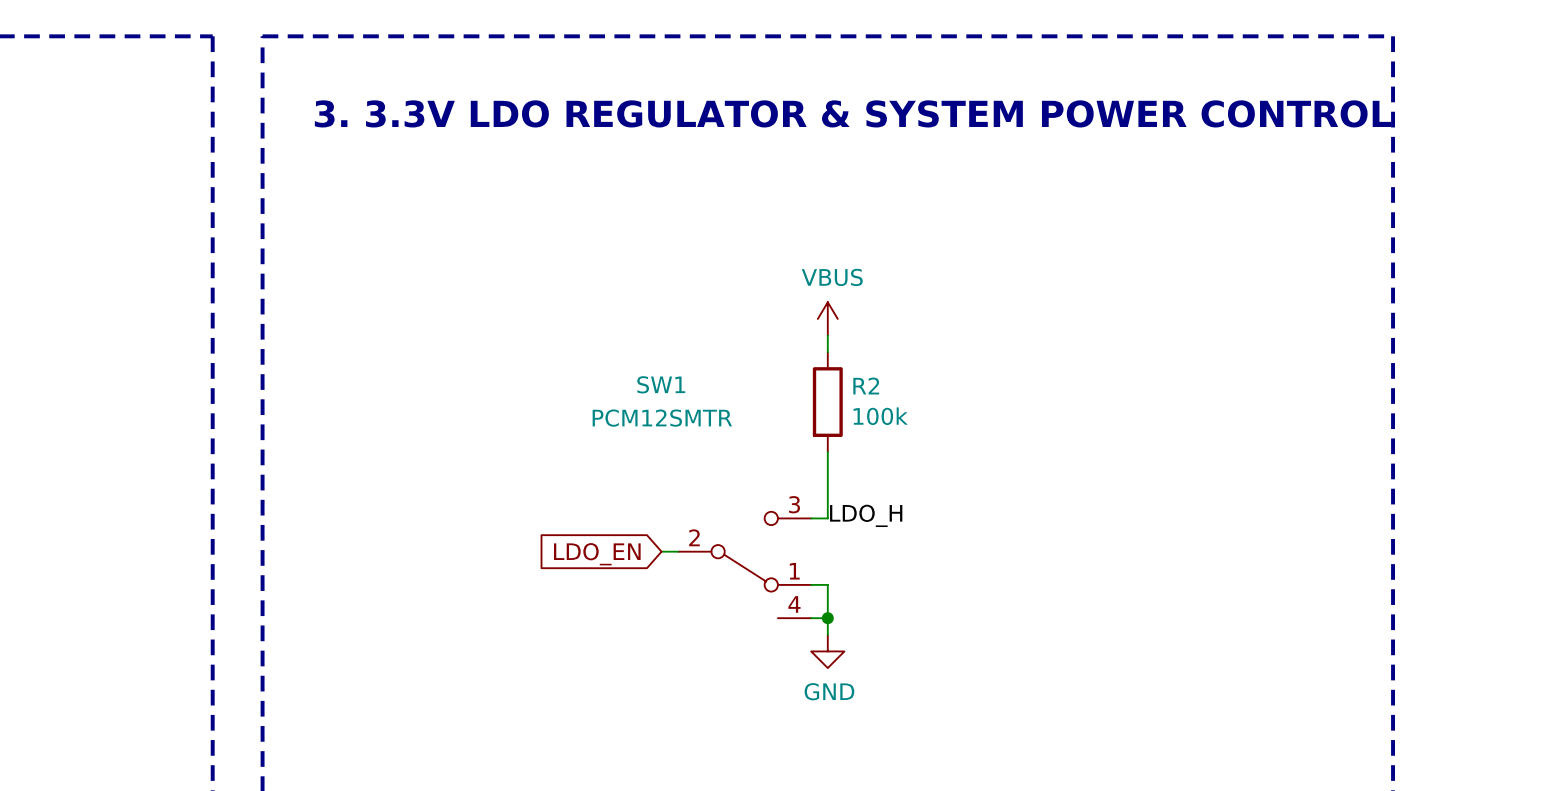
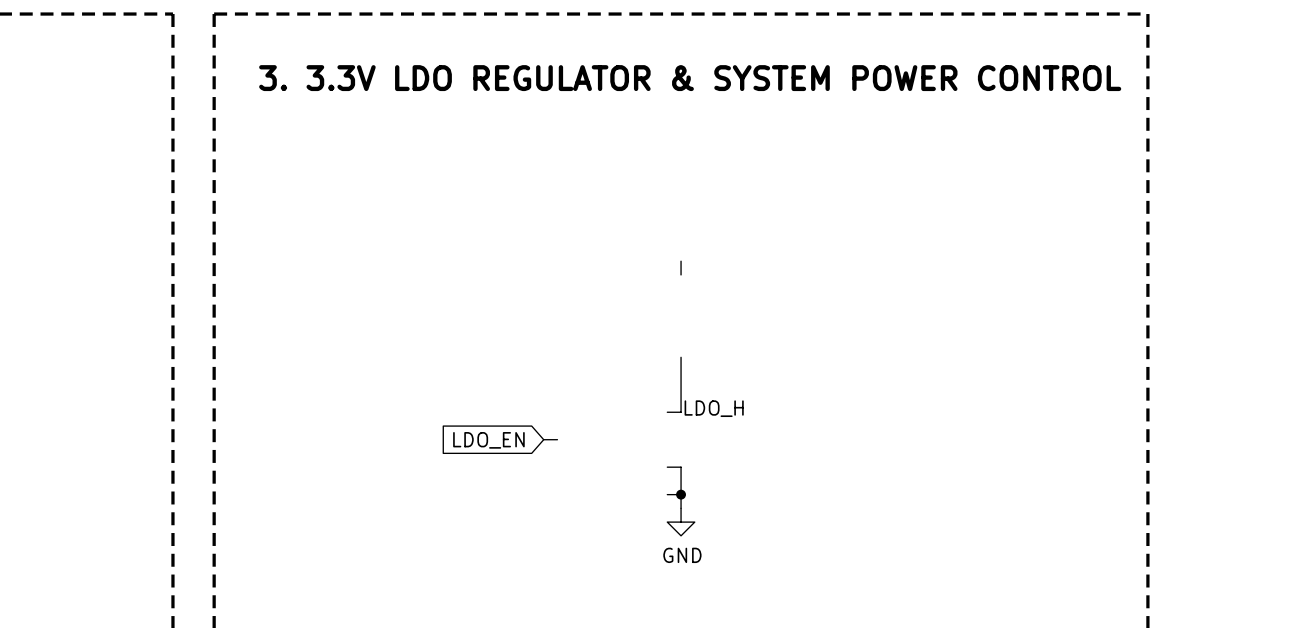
power symbol: VBUS (827, 318) -> none
R2: 100k (827, 402) -> none
SW1: PCM12SMTR (744, 564) -> none

